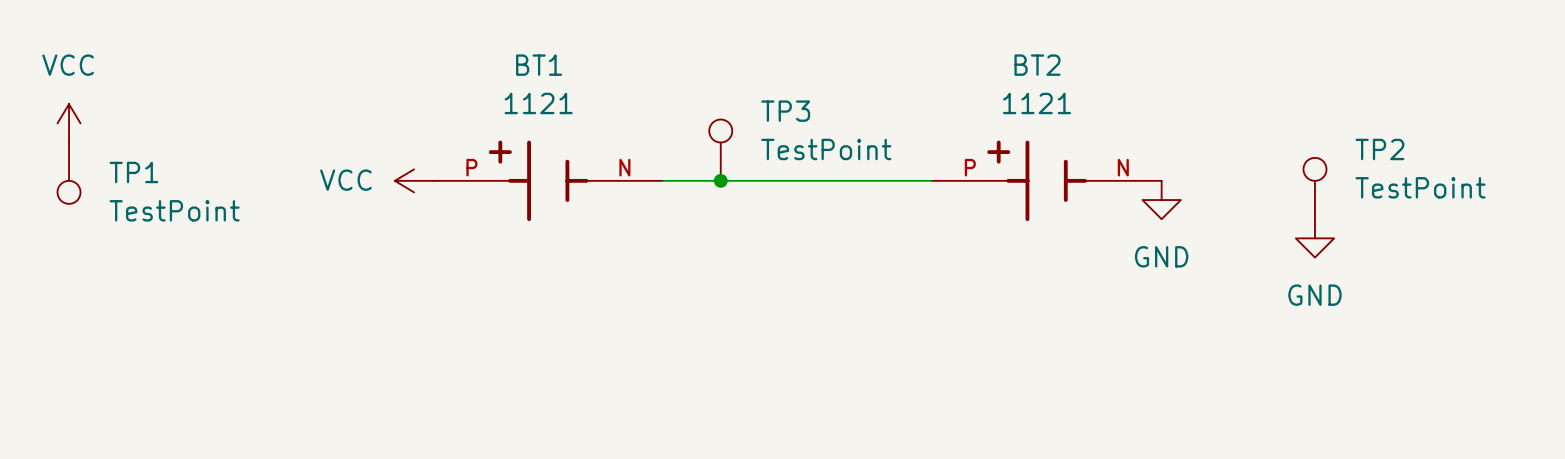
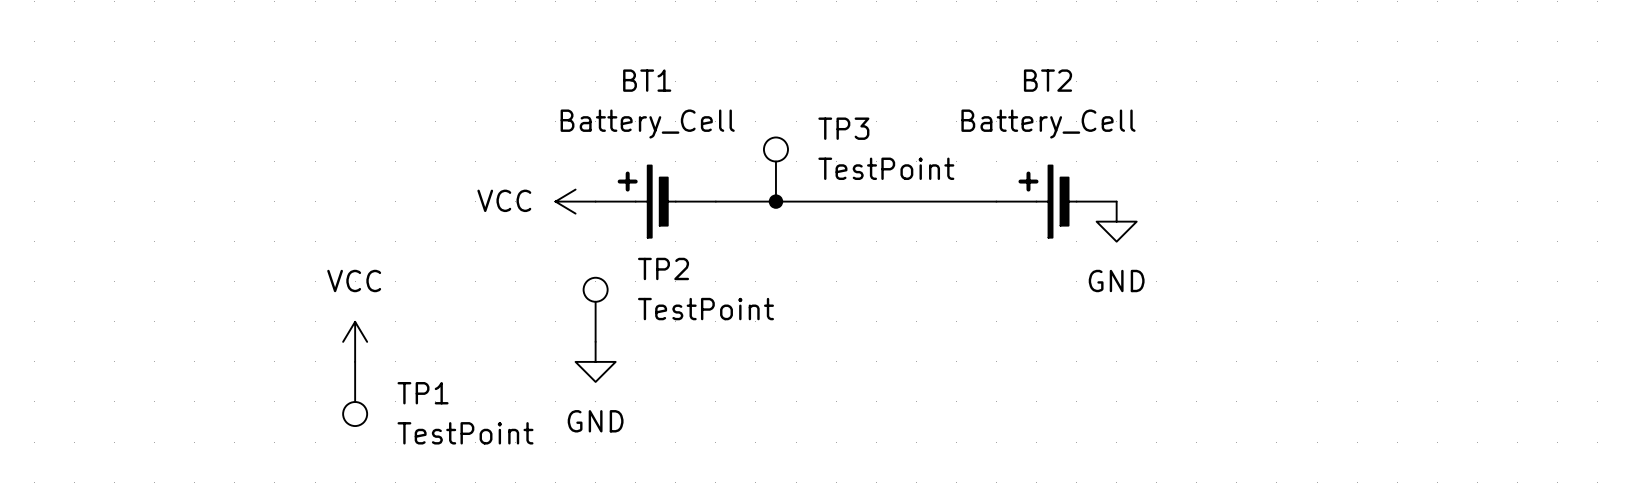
BT1 value: 1121 (538, 103) -> Battery_Cell (647, 124)
BT2 value: 1121 (1037, 103) -> Battery_Cell (1048, 124)
power symbol: VCC (69, 123) -> none
BT1 symbol: [433, 140, 664, 222] -> [595, 165, 716, 238]
BT2 symbol: [931, 140, 1162, 222] -> [996, 165, 1117, 238]
TP1 position: (69, 173) -> (355, 393)
power symbol: VCC (414, 180) -> none
power symbol: none -> VCC (575, 201)
TP2 position: (1314, 188) -> (595, 309)
power symbol position: GND (1161, 200) -> GND (1116, 221)
power symbol: GND (1314, 238) -> none
power symbol: none -> VCC (355, 341)
power symbol: none -> GND (595, 361)

